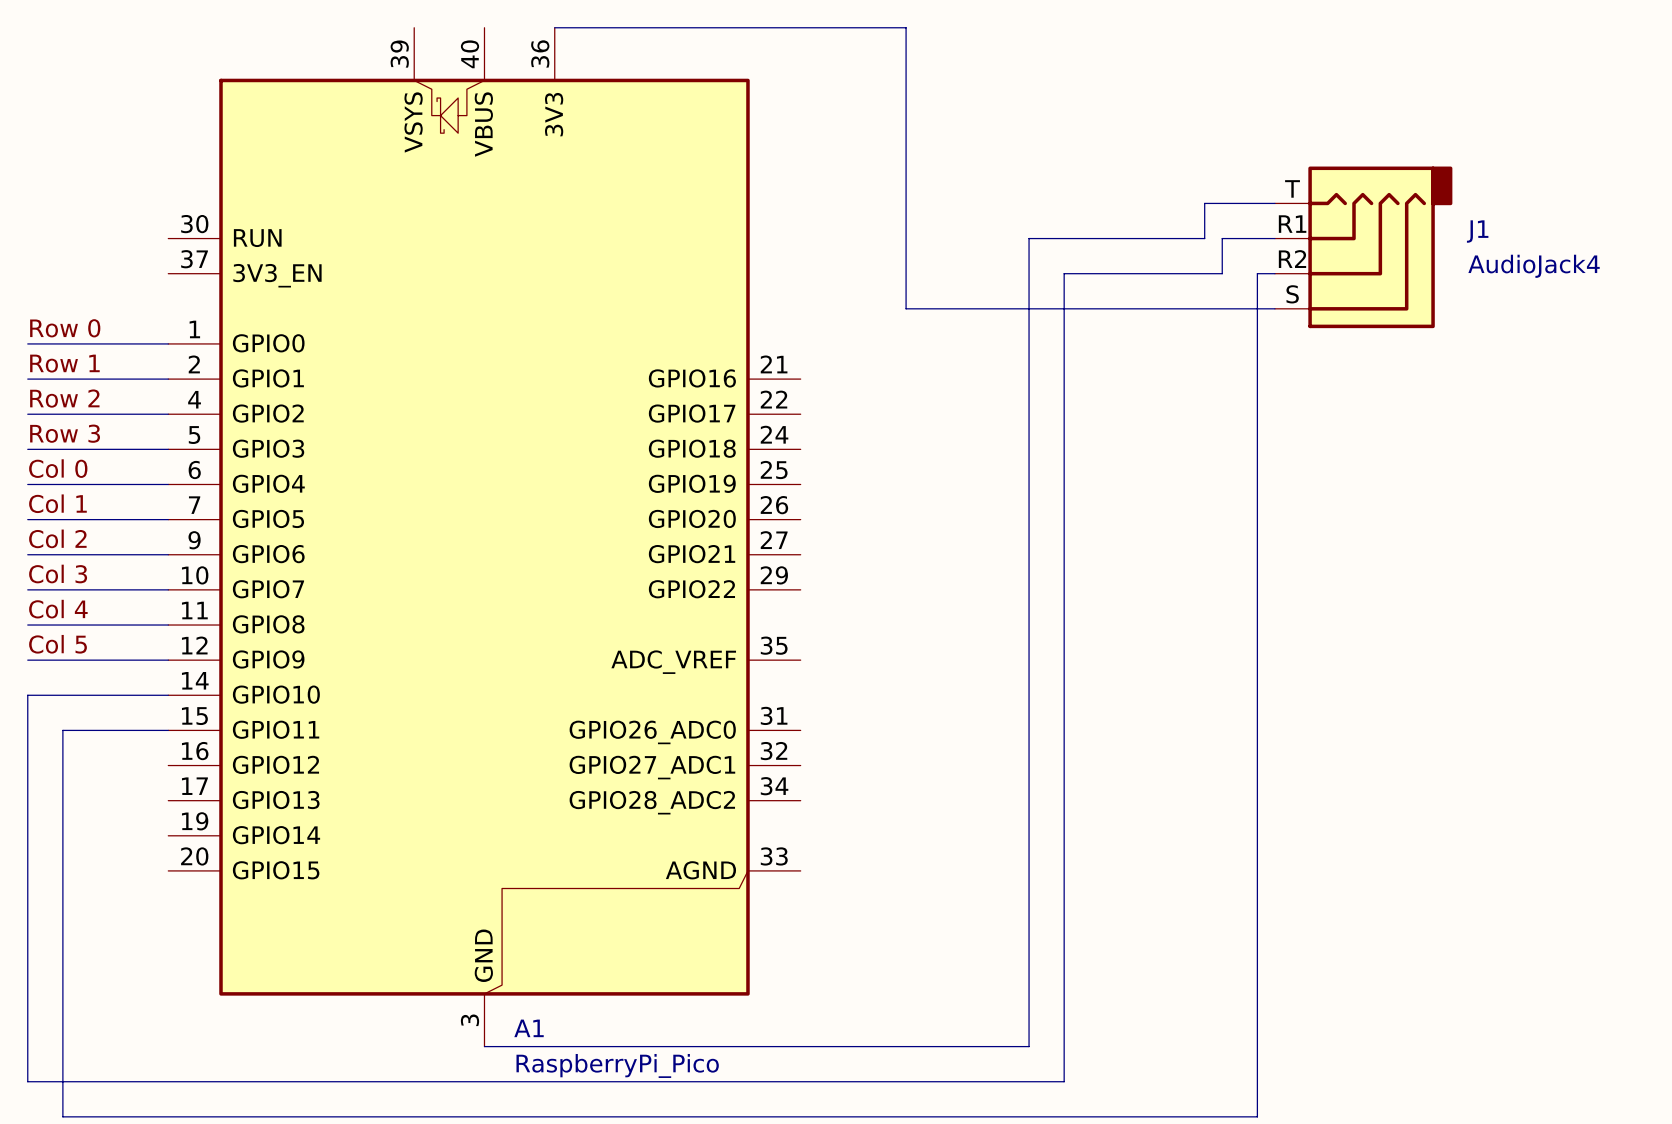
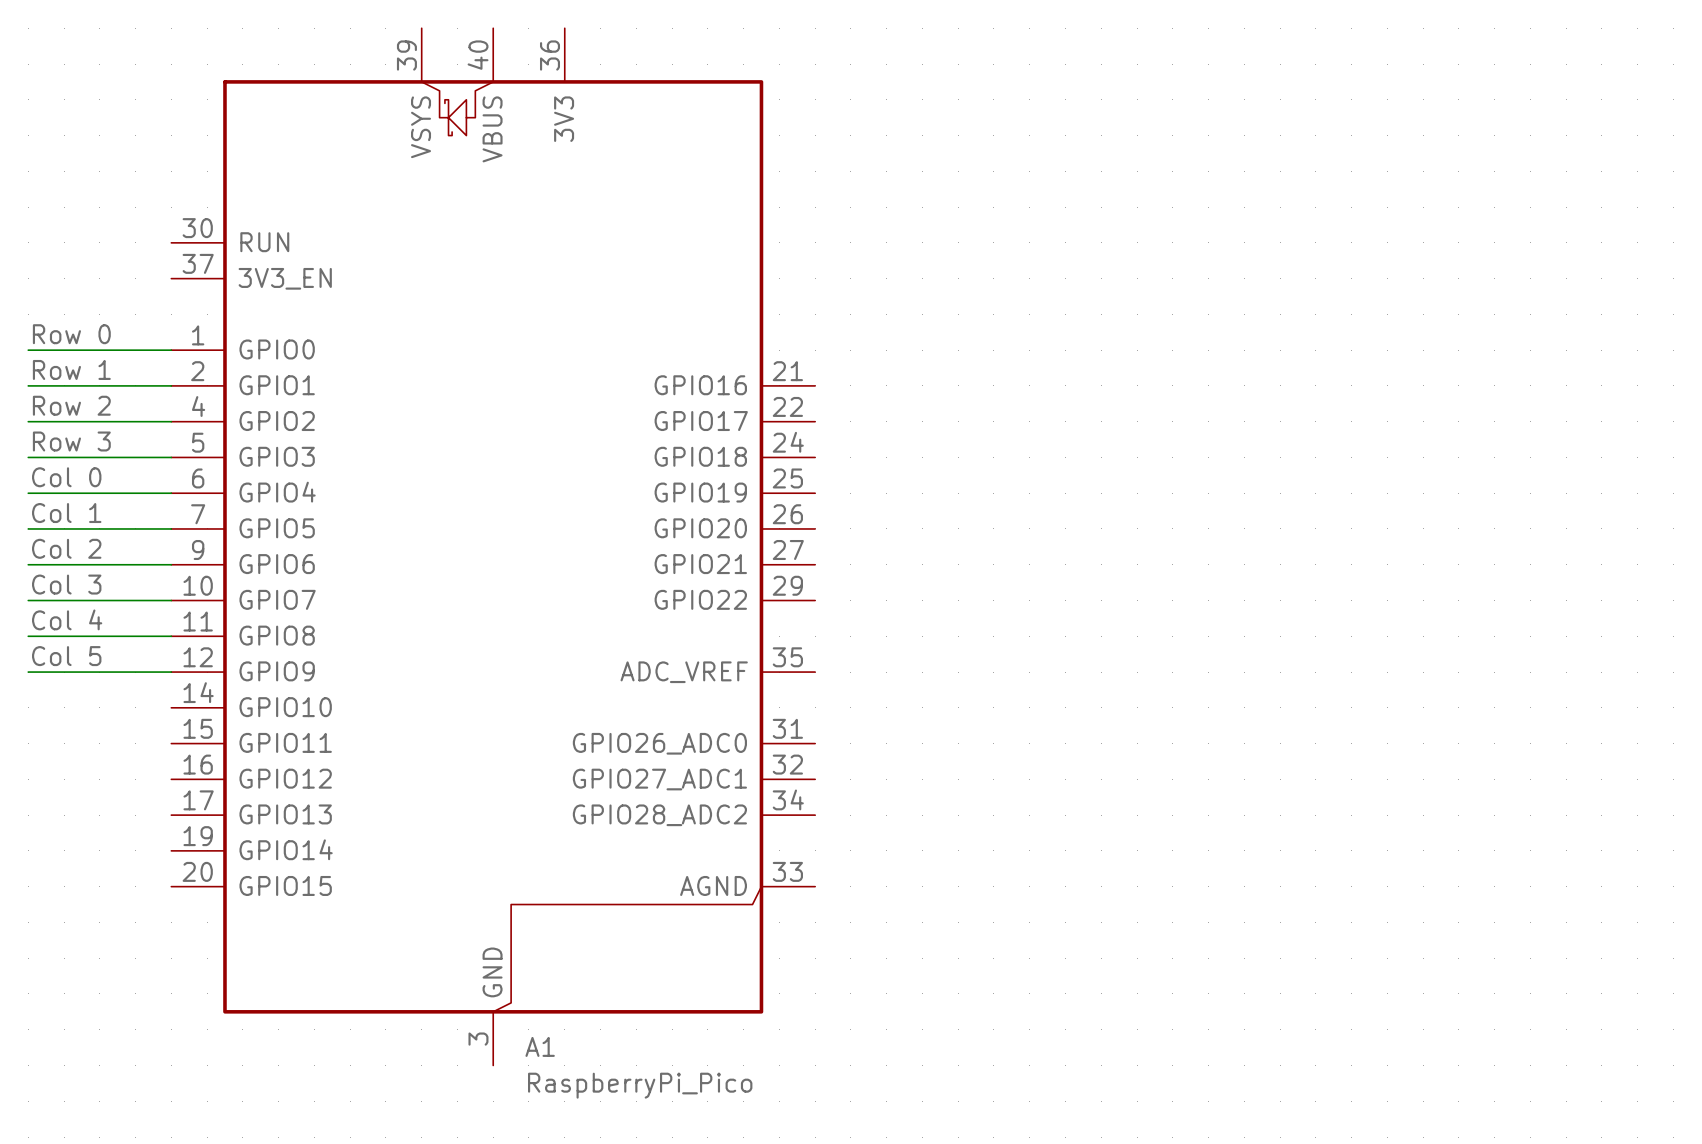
wire: (554, 27) (906, 27) (906, 308) (1274, 308) -> none
wire: (1274, 203) (1204, 203) (1204, 238) (1029, 238) (1029, 1046) (484, 1046) -> none
wire: (1274, 238) (1222, 238) (1222, 273) (1064, 273) (1064, 1081) (27, 1081) (27, 695) (168, 695) -> none
J1: AudioJack4 (1363, 247) -> none
wire: (1274, 273) (1257, 273) (1257, 1116) (62, 1116) (62, 730) (168, 730) -> none

